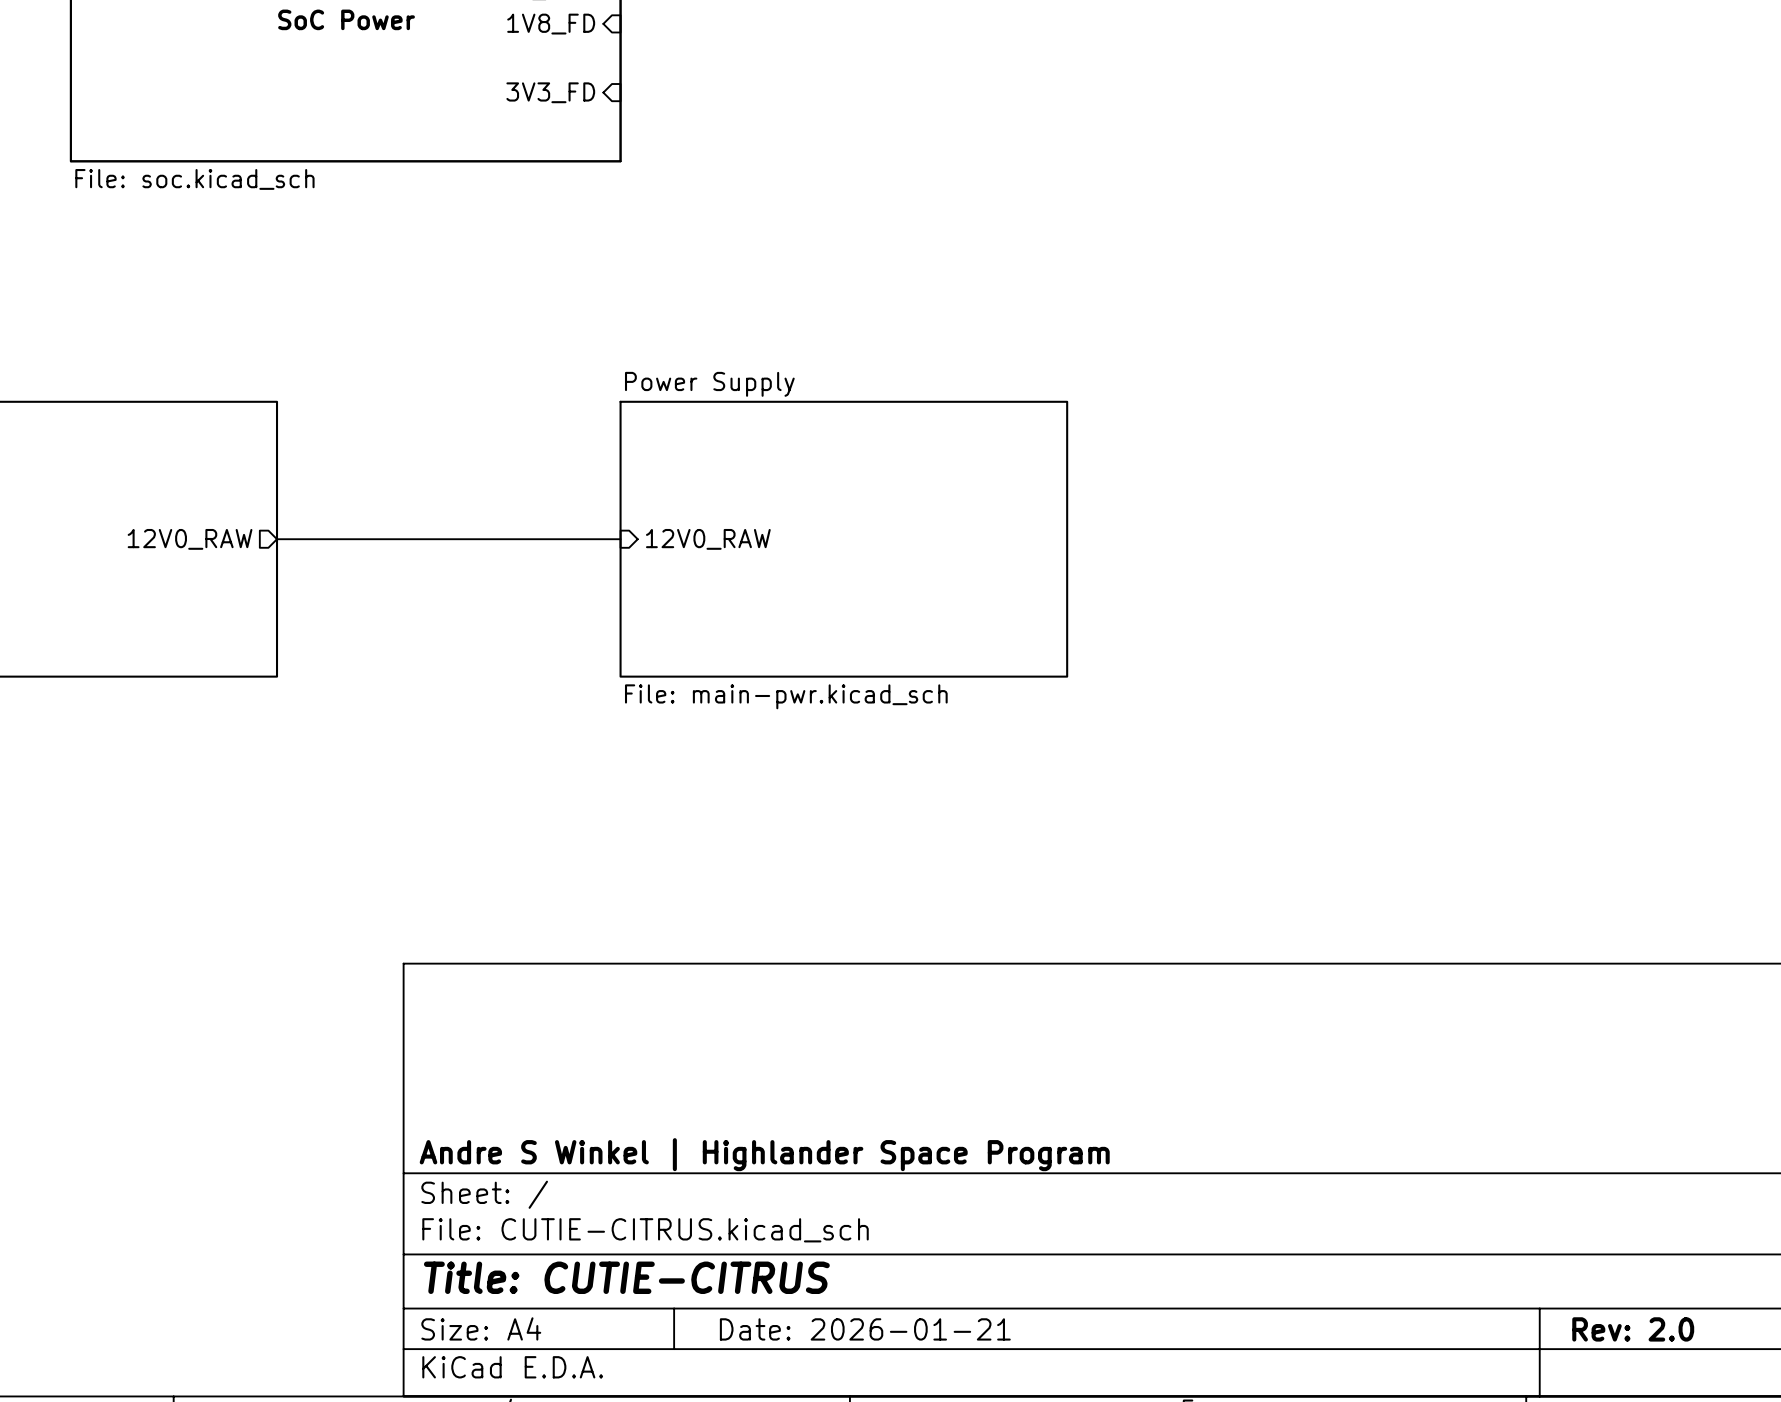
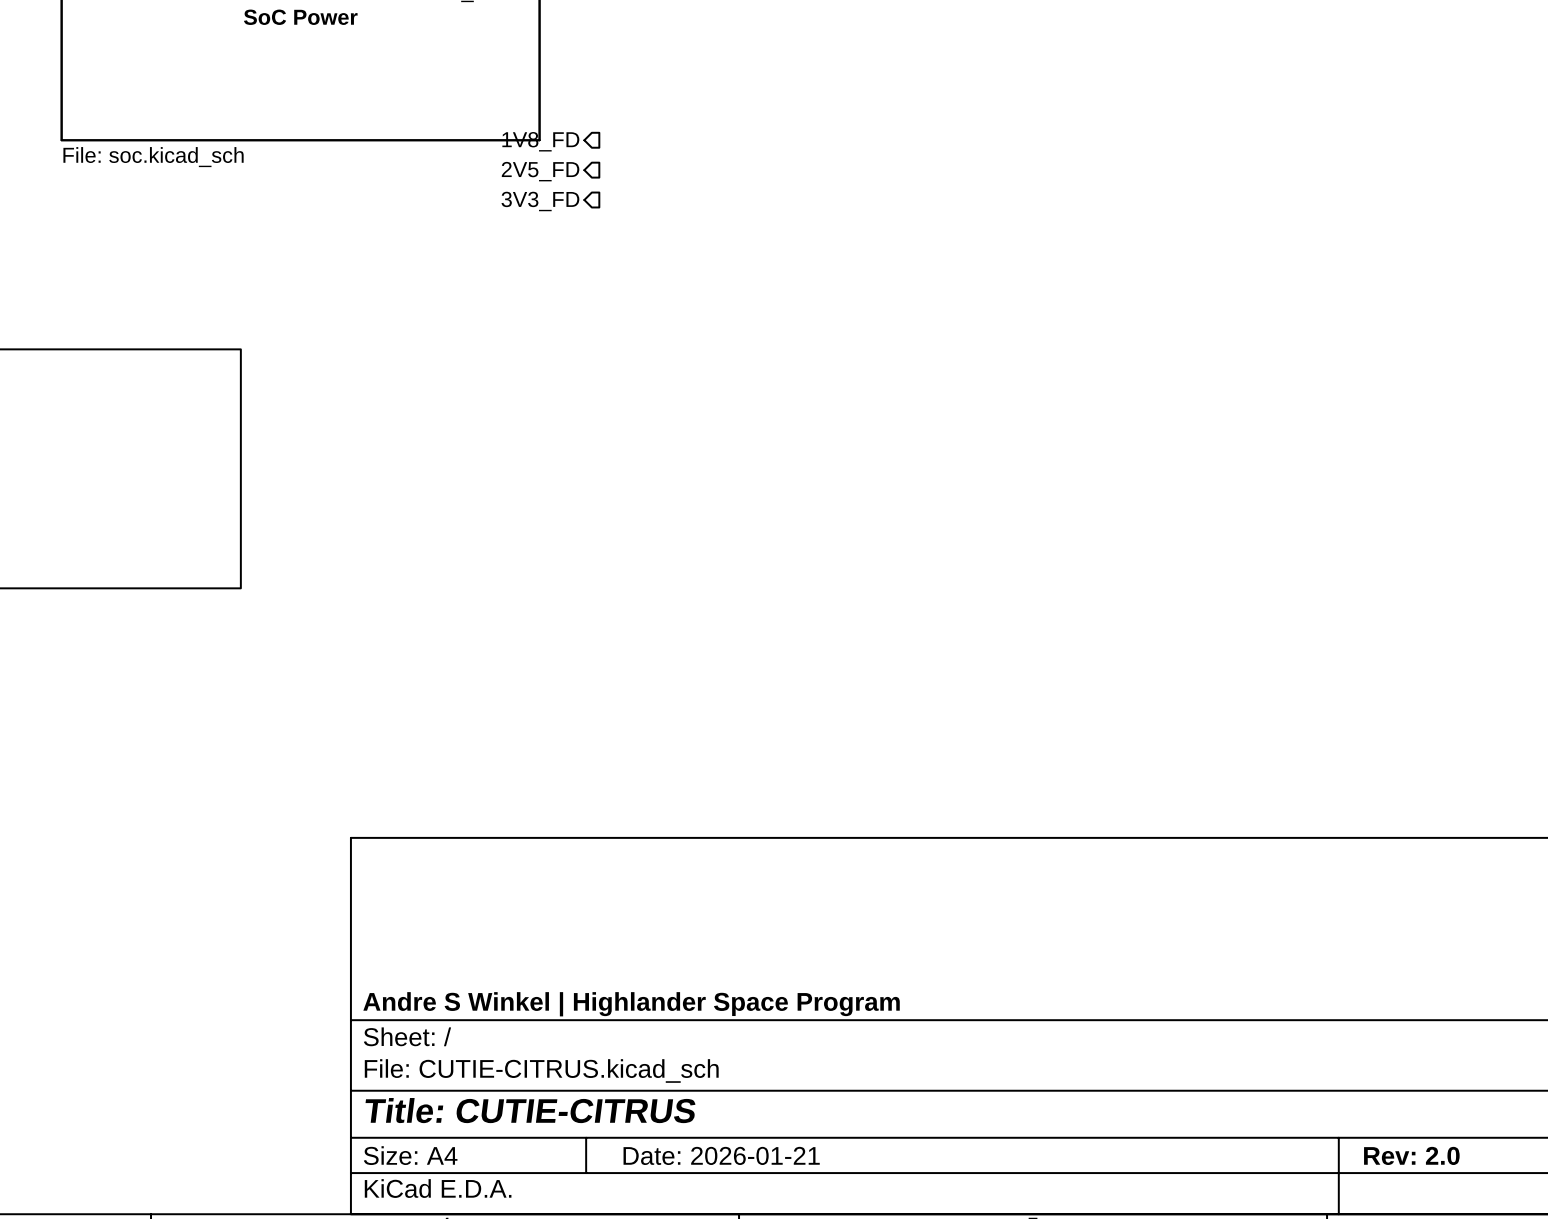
sheet pin position: 1V8_FD (551, 24) -> 1V8_FD (540, 141)
sheet pin position: 3V3_FD (550, 92) -> 3V3_FD (540, 201)
sheet pin: none -> 2V5_FD (540, 171)
sheet pin: 12V0_RAW (190, 539) -> none
wire: (277, 539) (620, 539) -> none
sheet pin: 12V0_RAW (708, 539) -> none
sheet Power Supply: File: main-pwr.kicad_sch (843, 539) -> none

